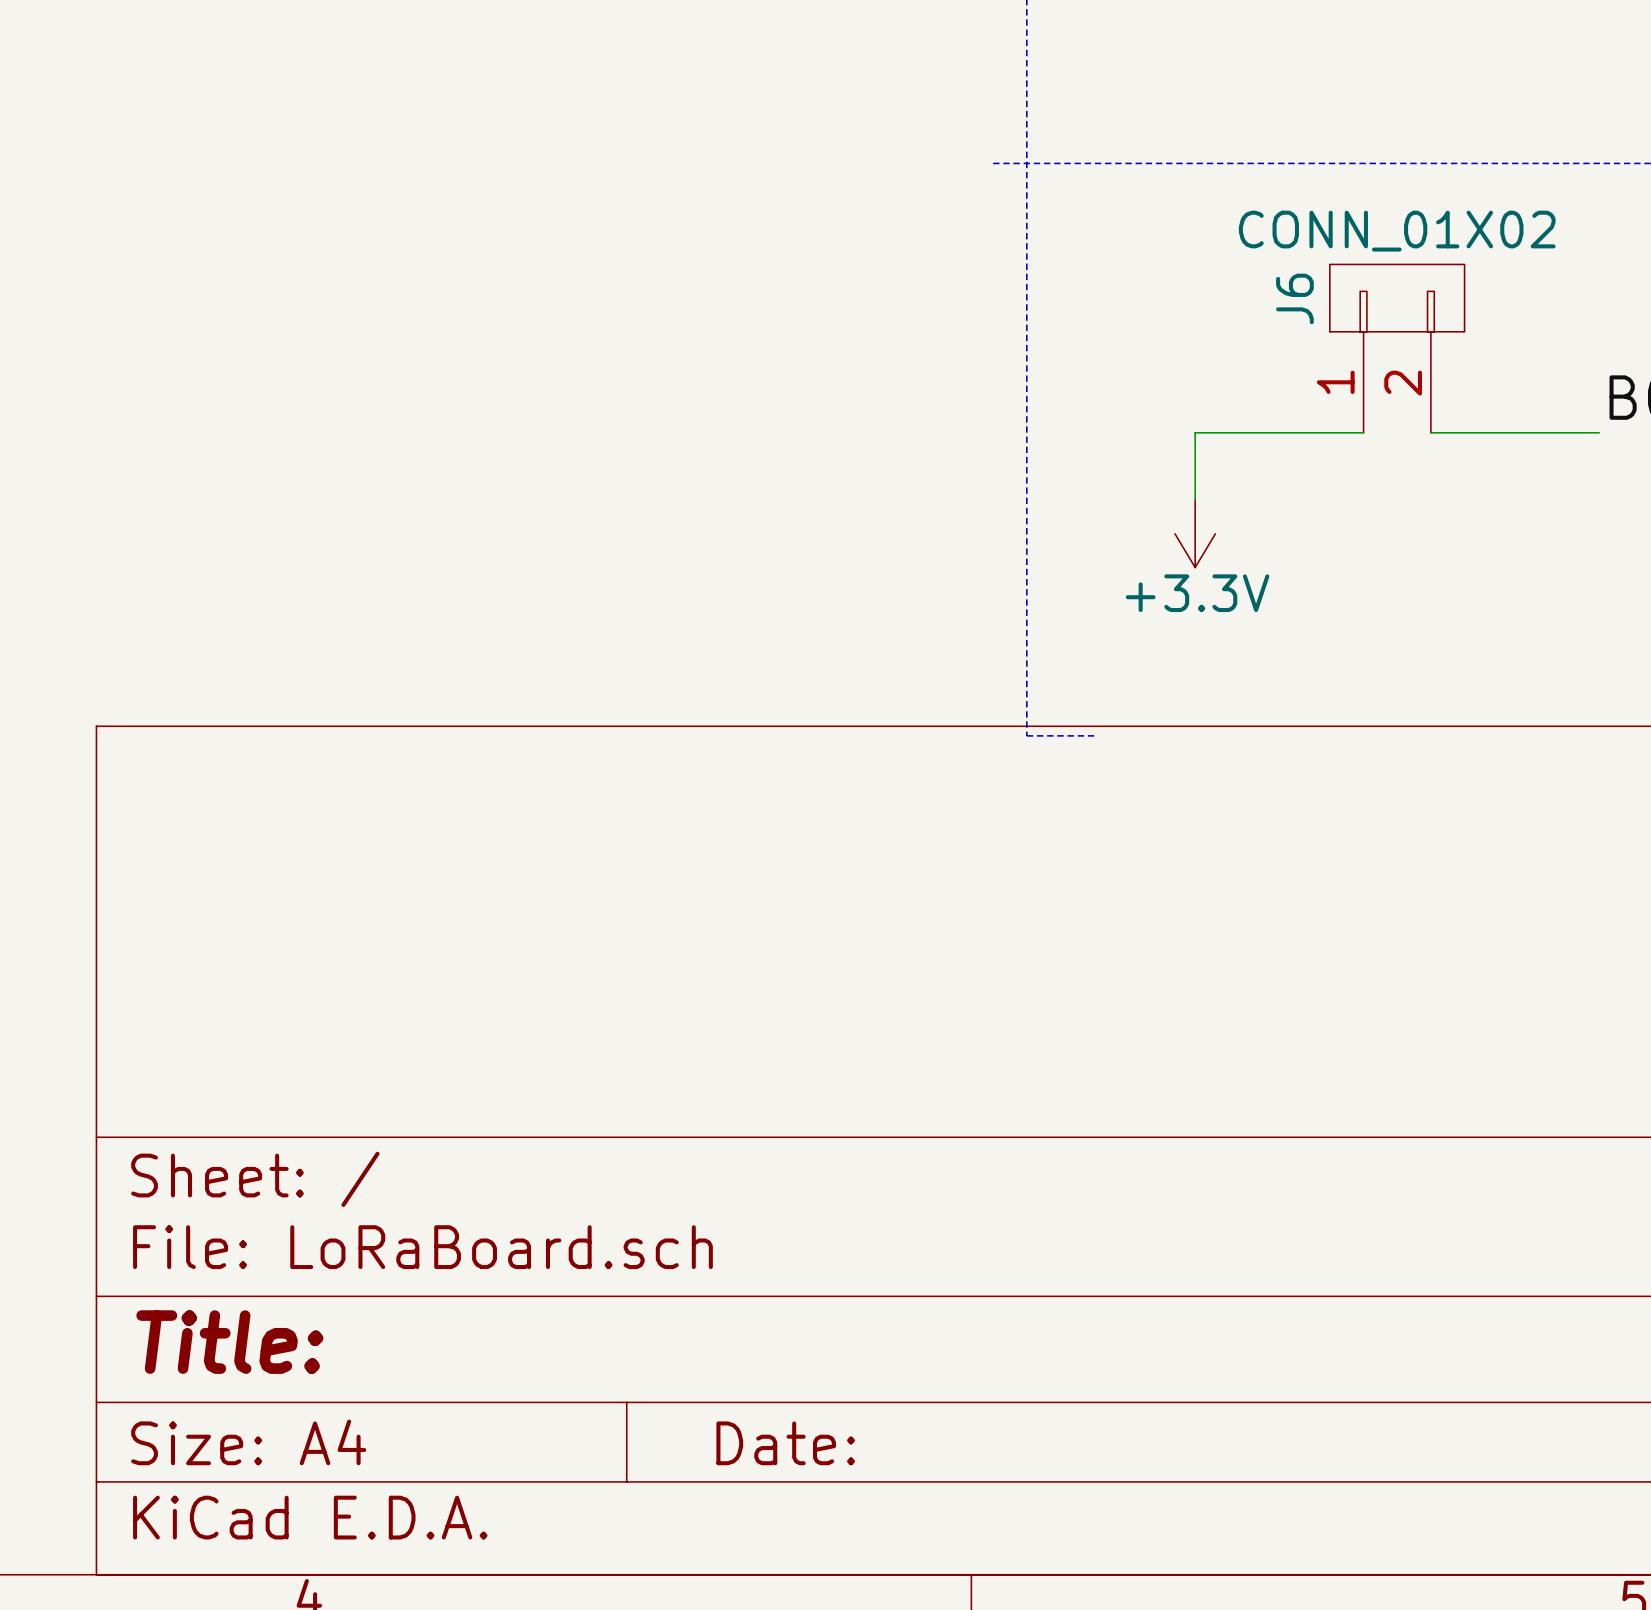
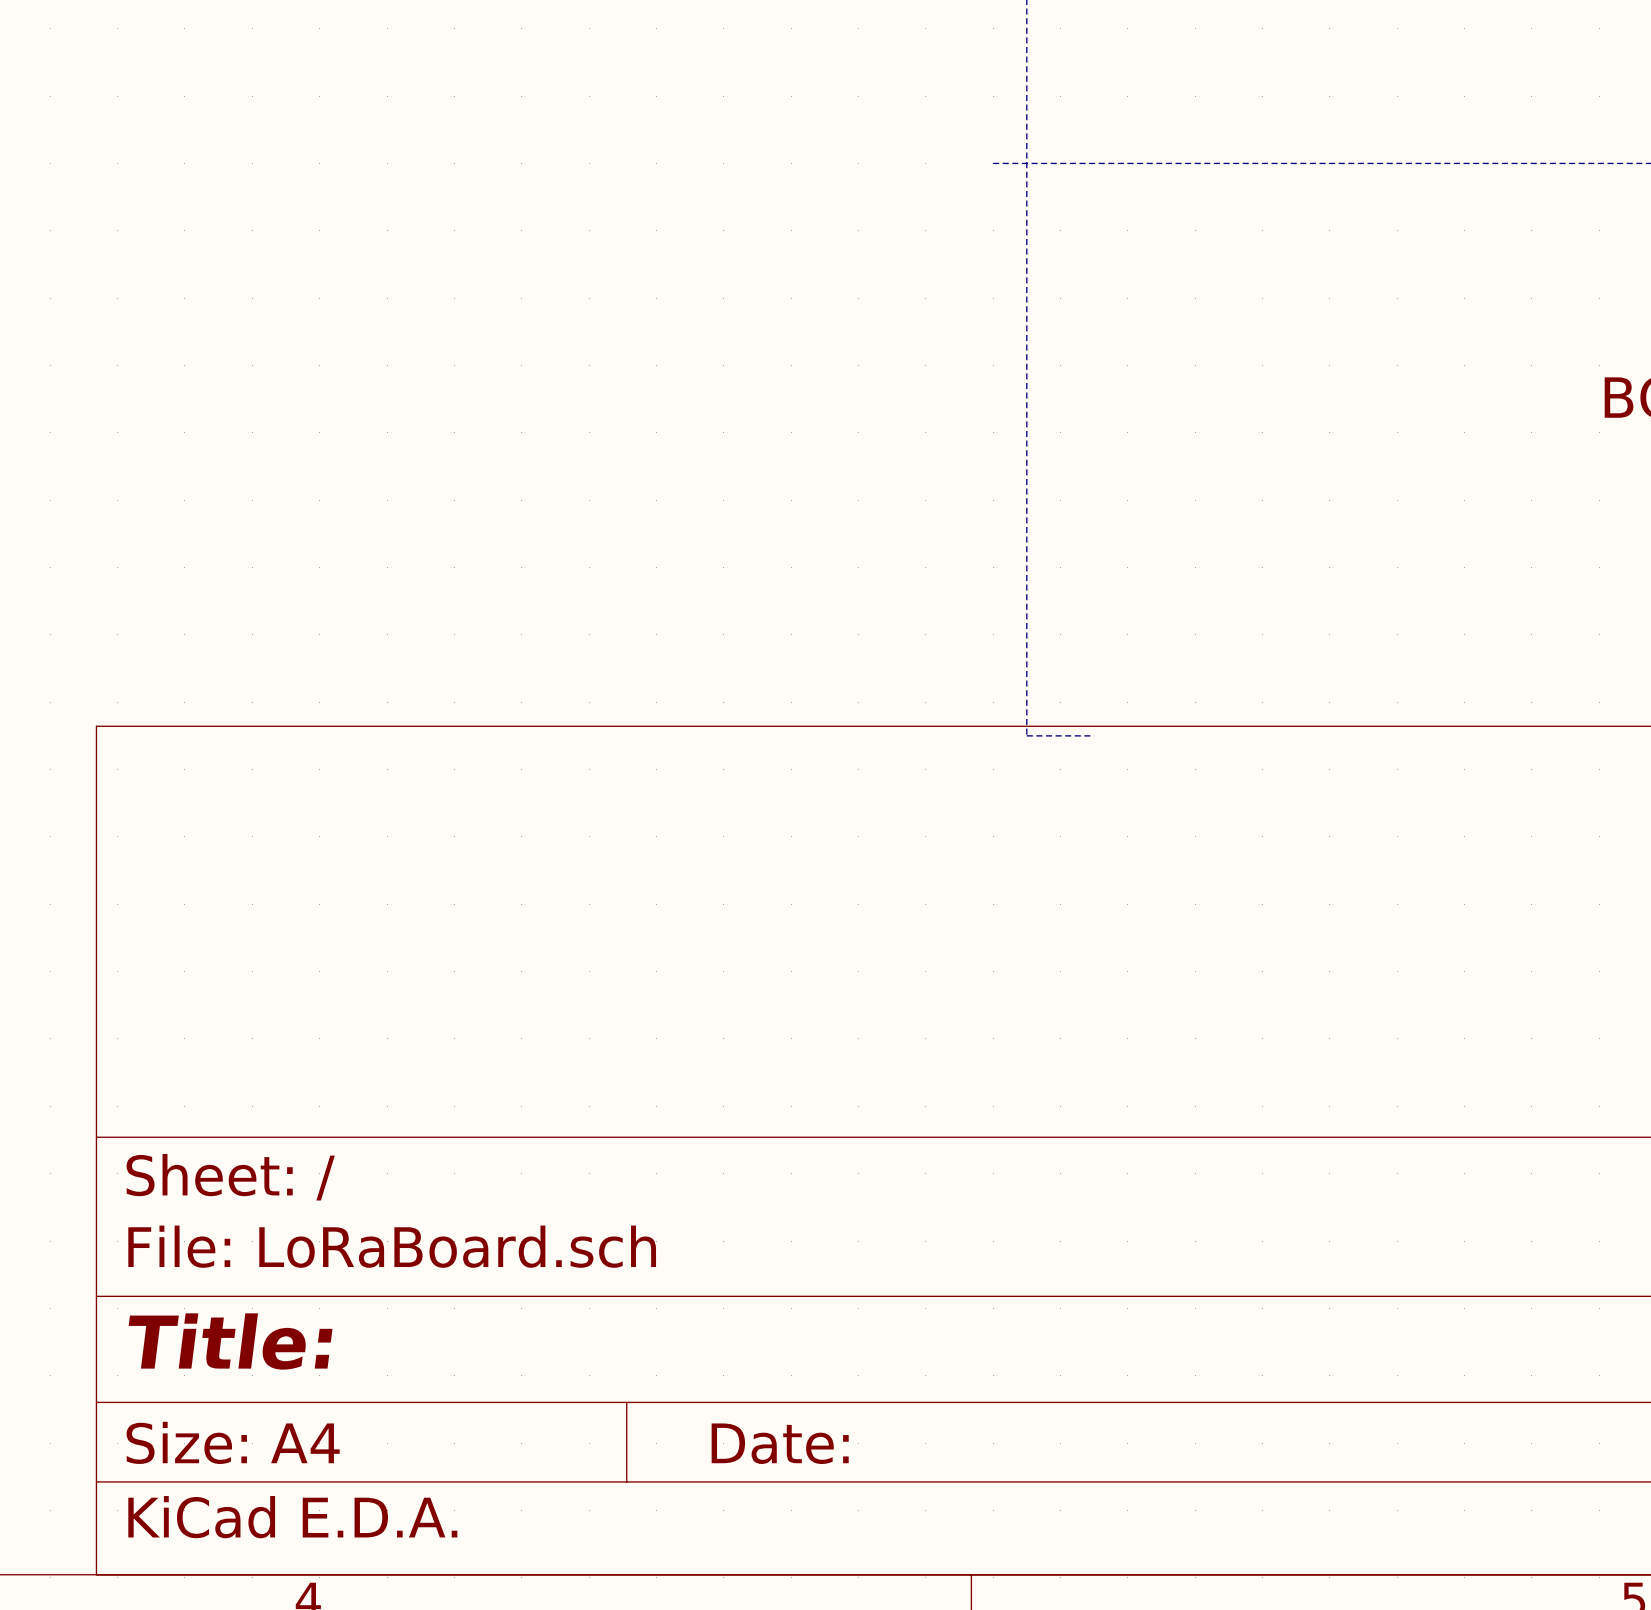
J6: CONN_01X02 (1397, 348) -> none
wire: (1363, 432) (1195, 432) (1195, 500) -> none
wire: (1430, 432) (1599, 432) -> none
power symbol: +3.3V (1195, 533) -> none

